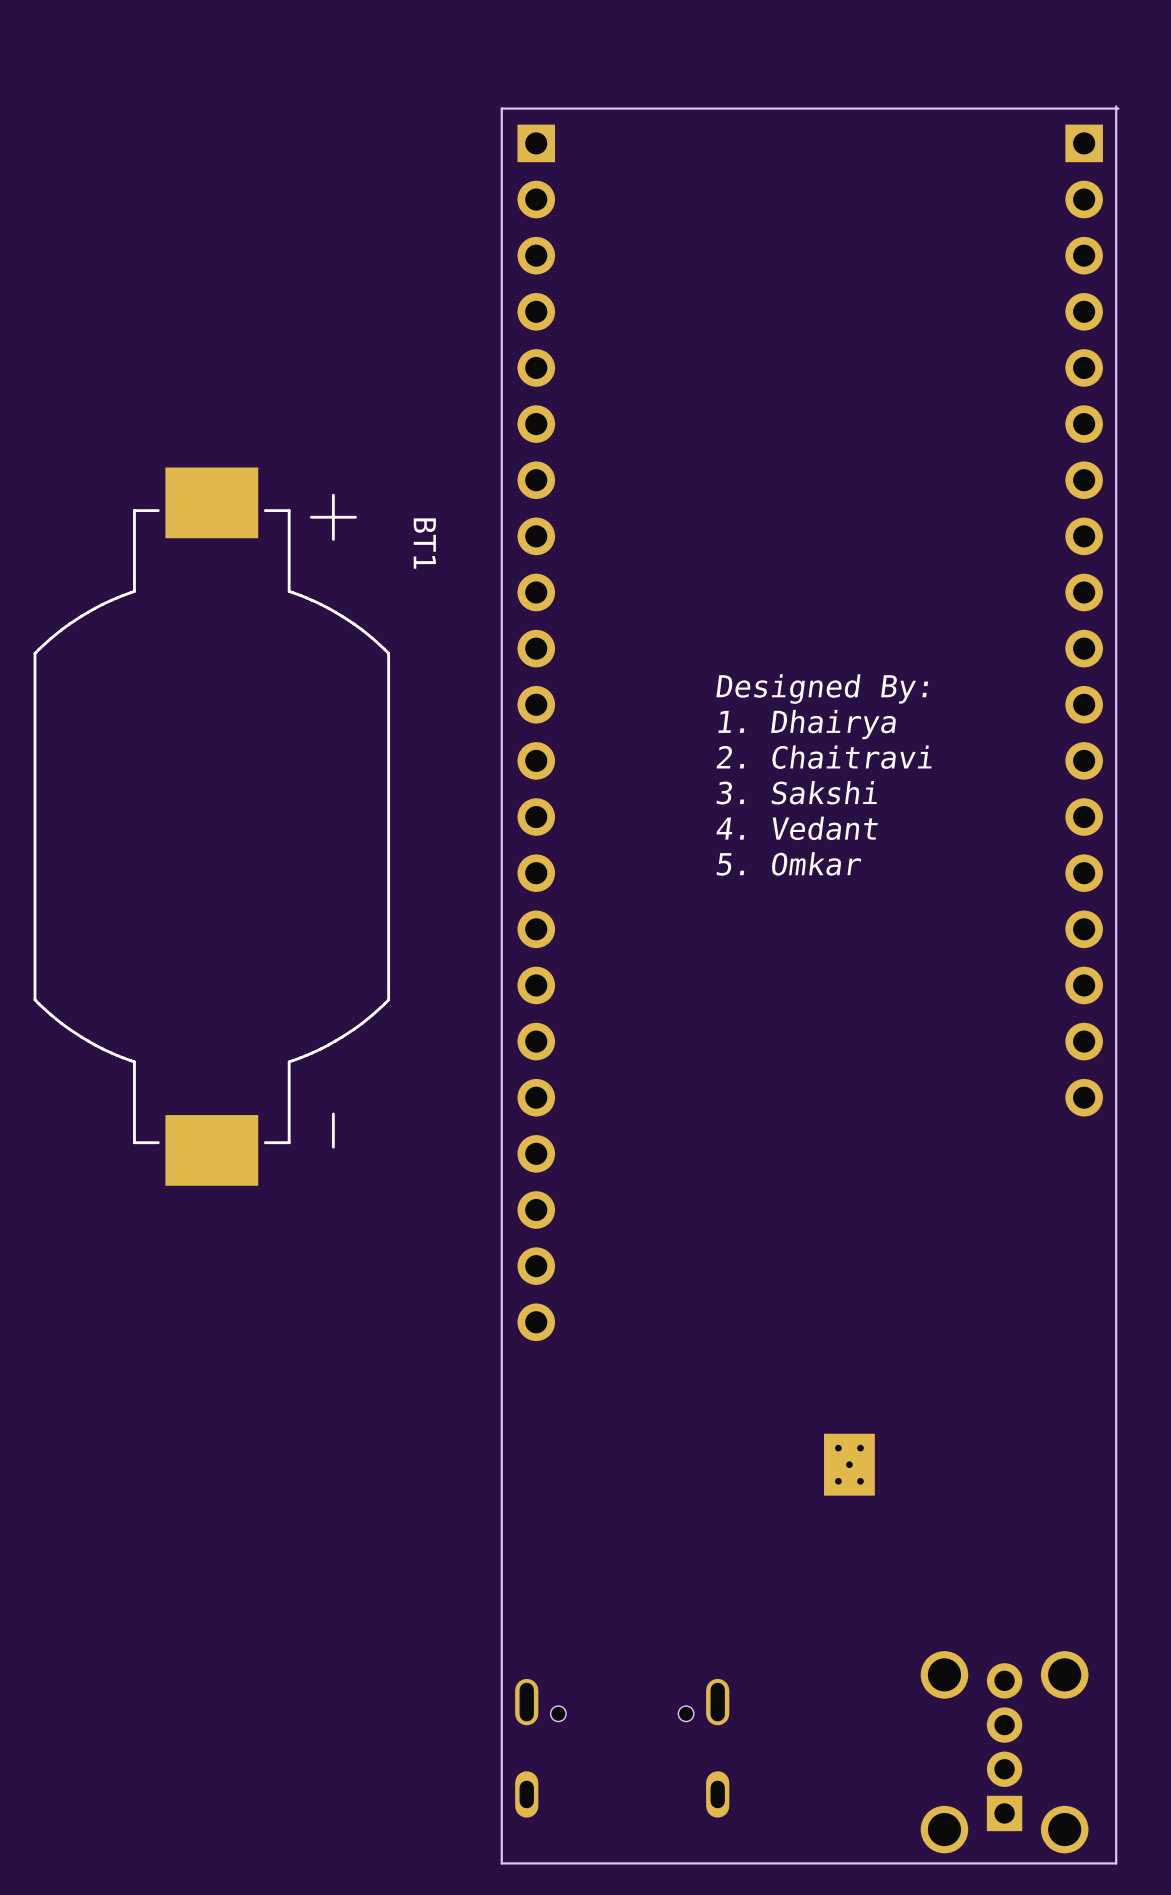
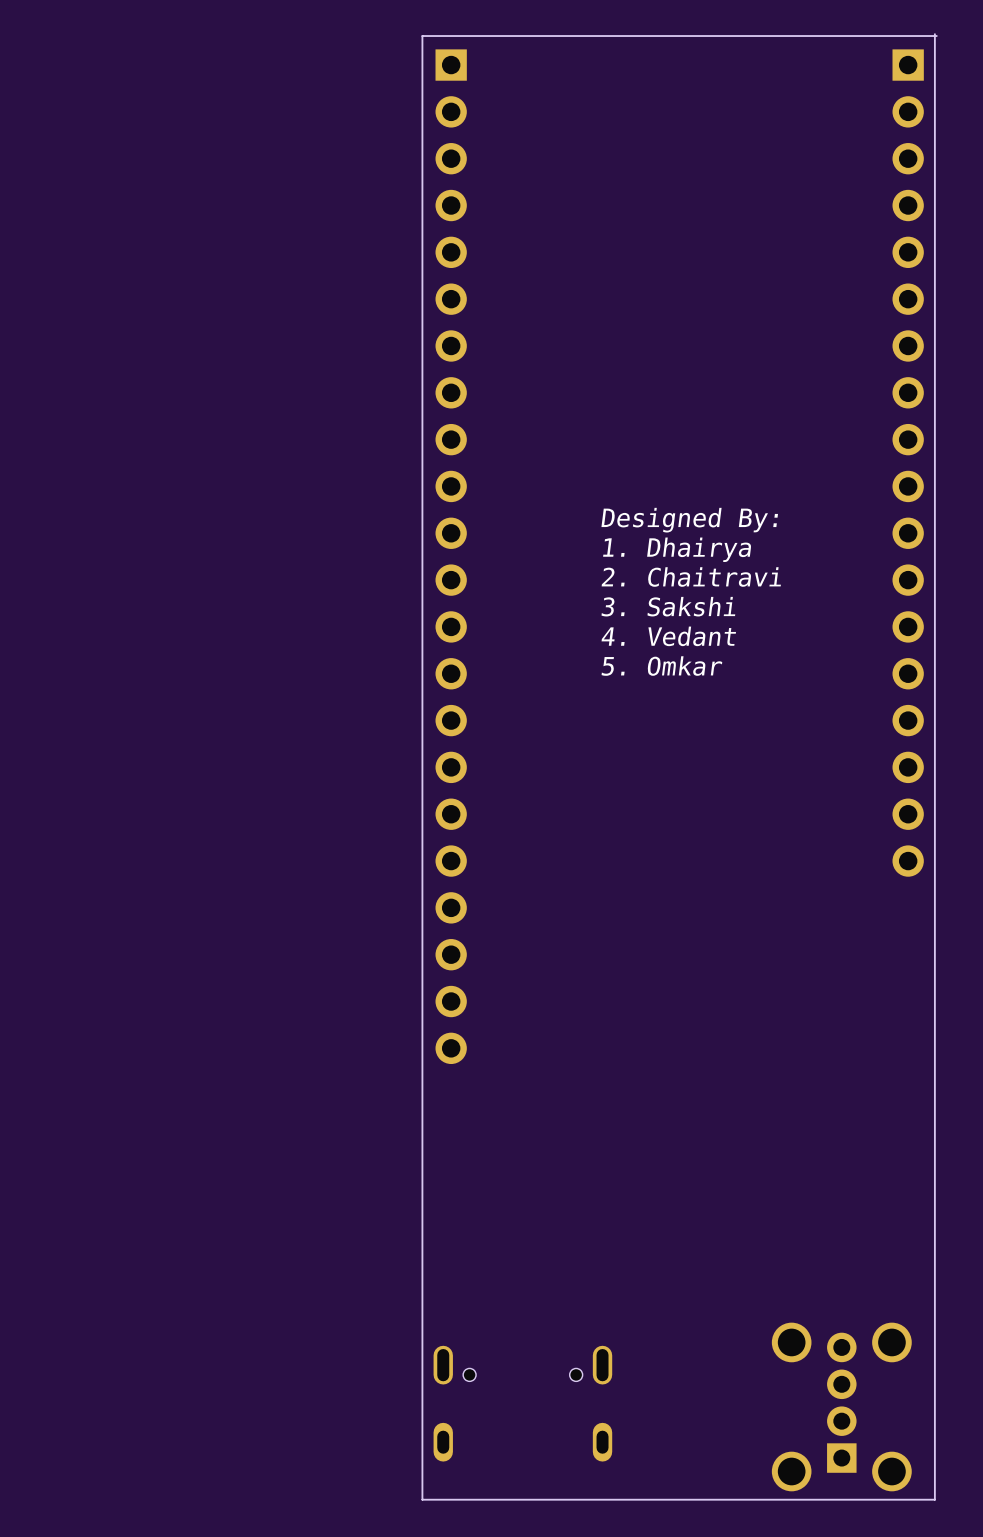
BT1: (211, 826) -> none
part: (849, 1464) -> none

